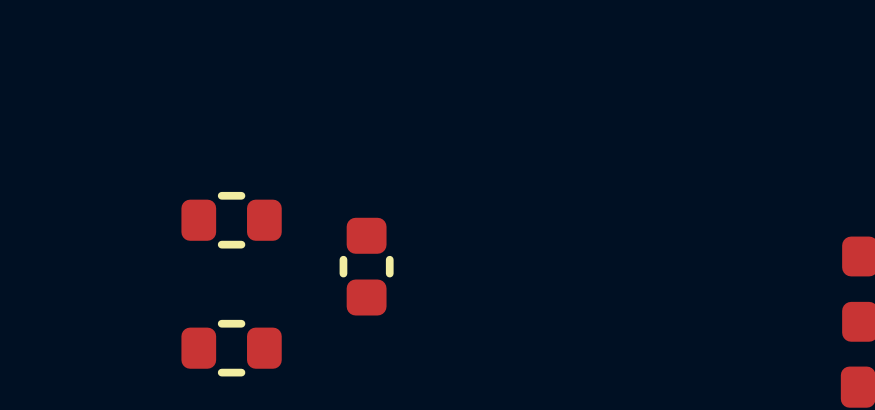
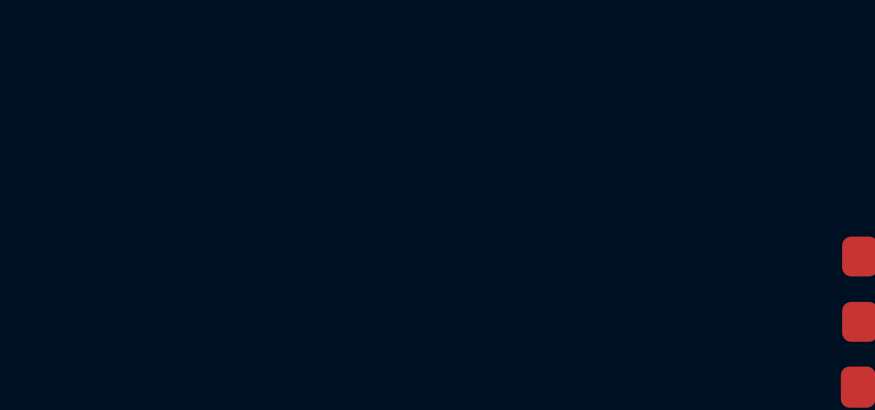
part: (231, 220) -> none
part: (366, 266) -> none
part: (231, 348) -> none

